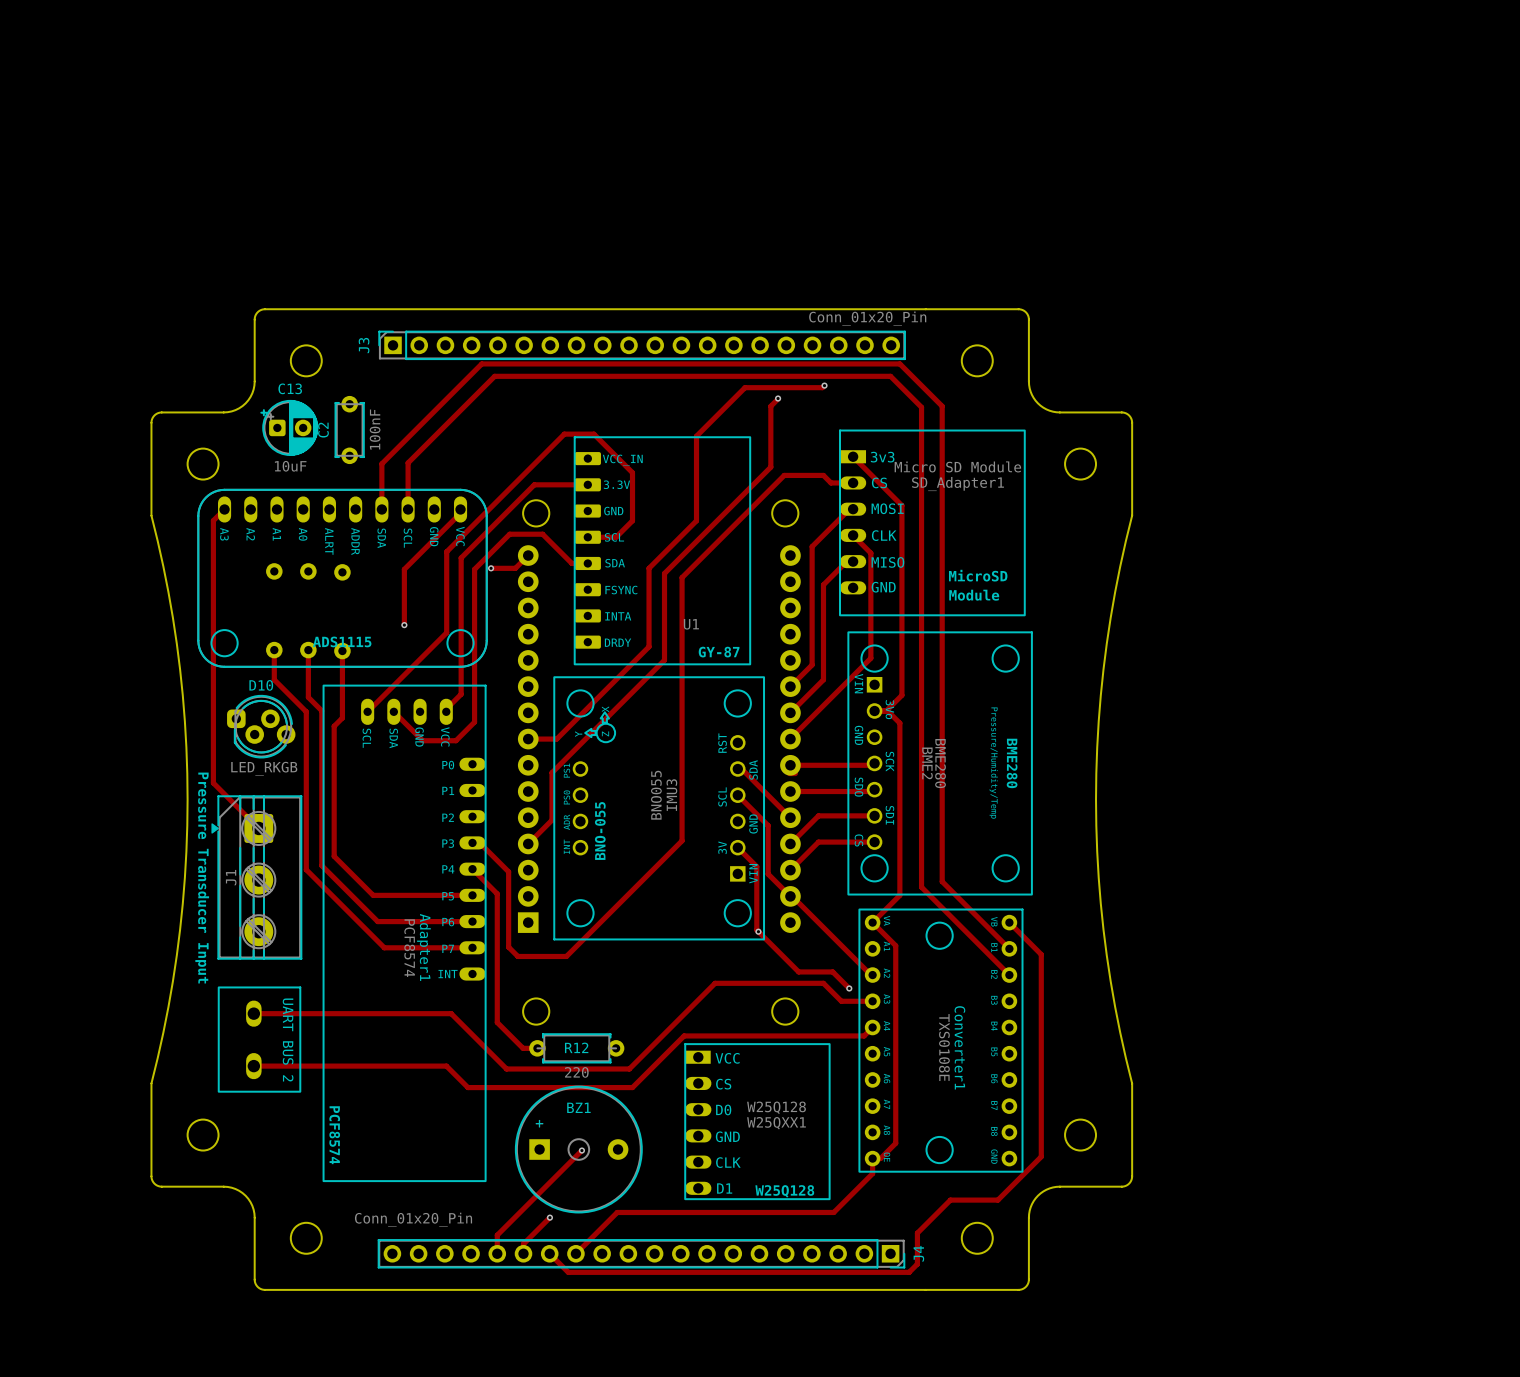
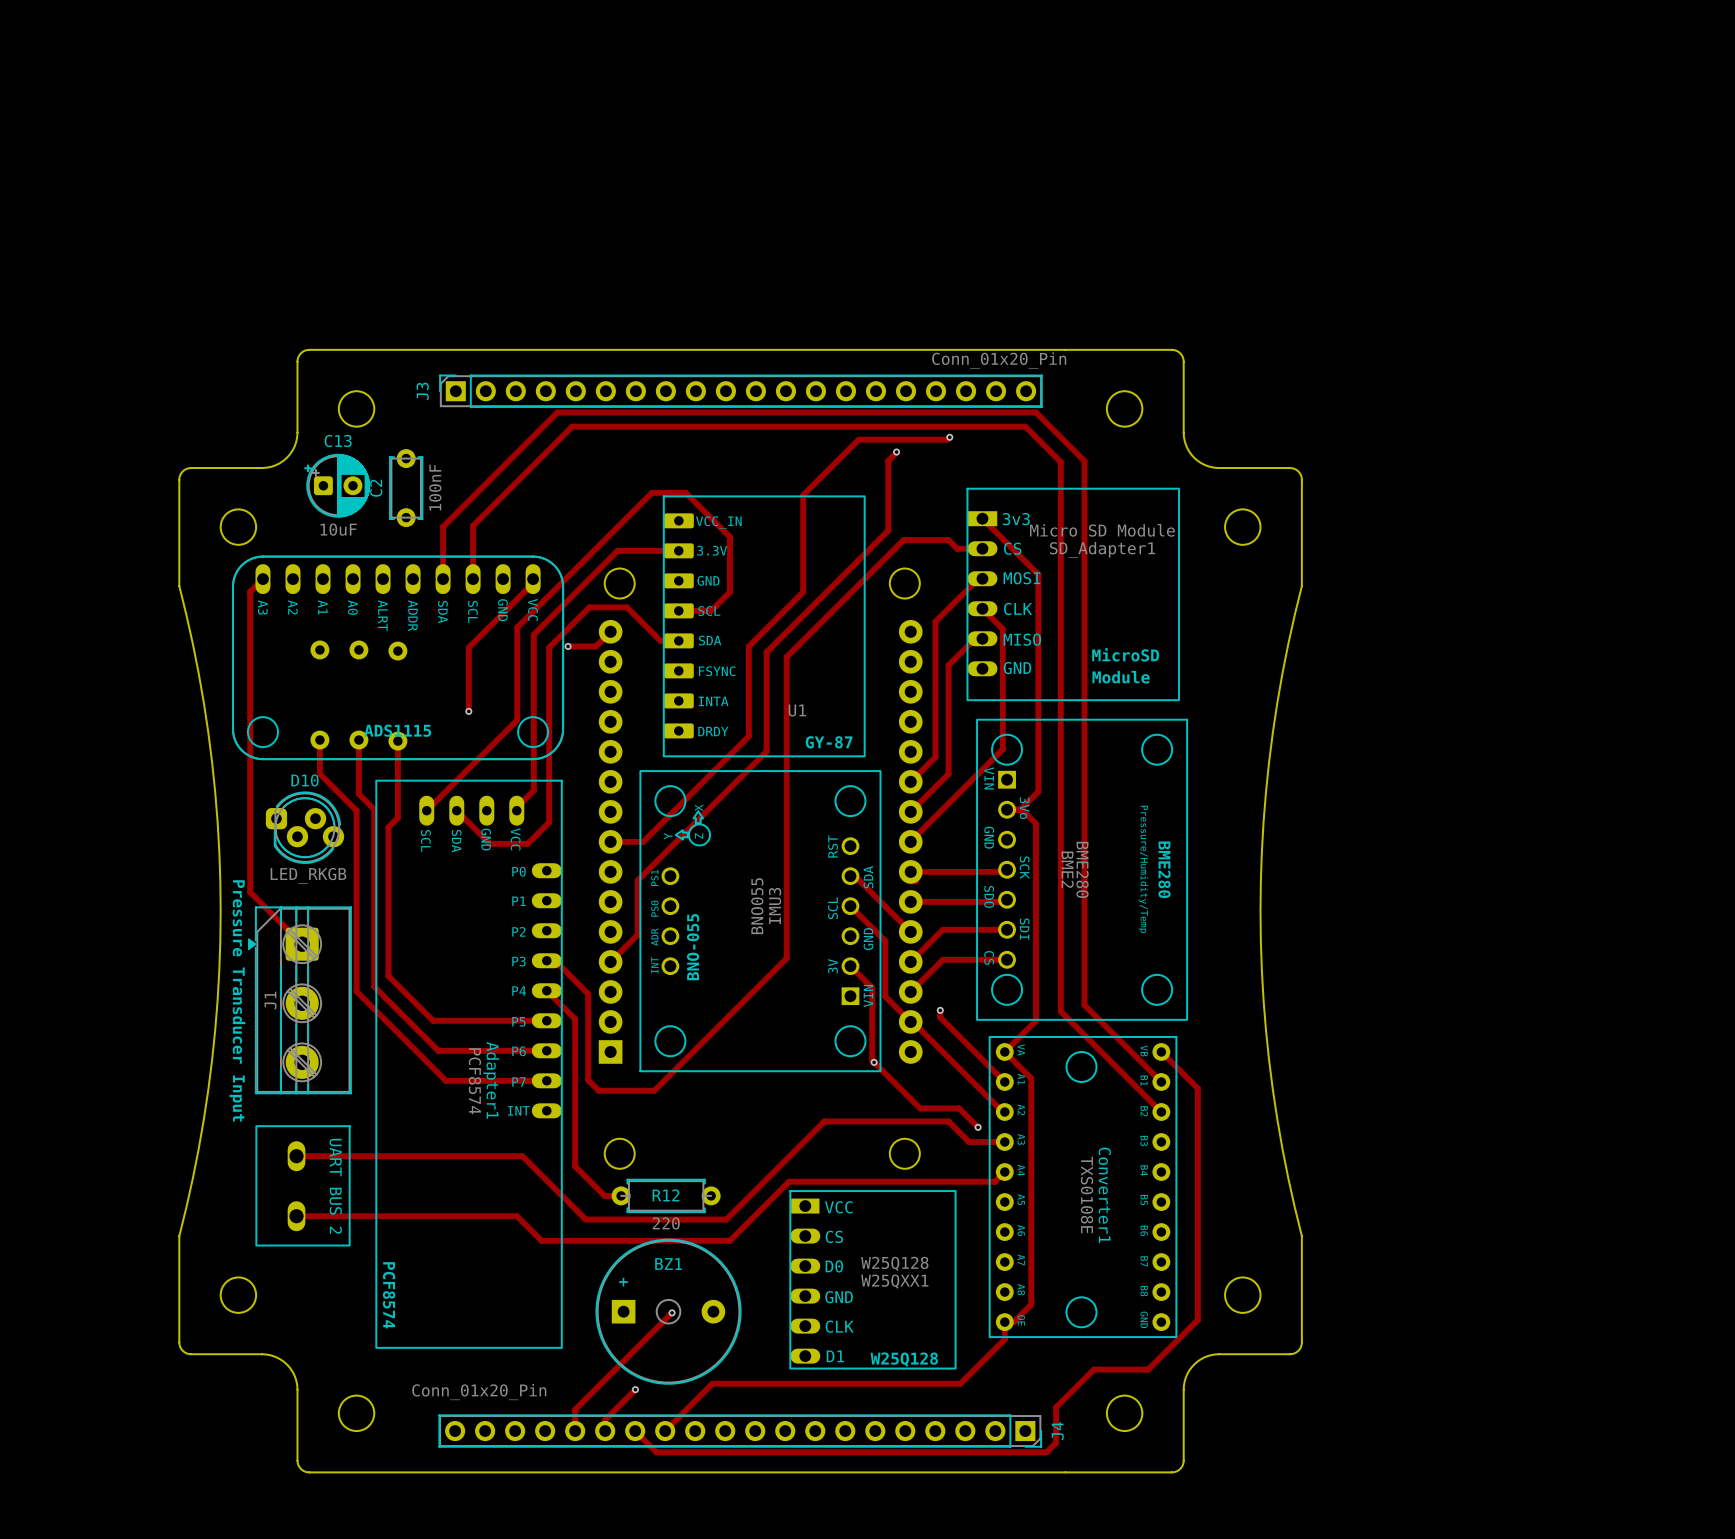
track: none -> (940, 1010) (940, 1017) (1004, 1081)
via: none -> (940, 1010)

